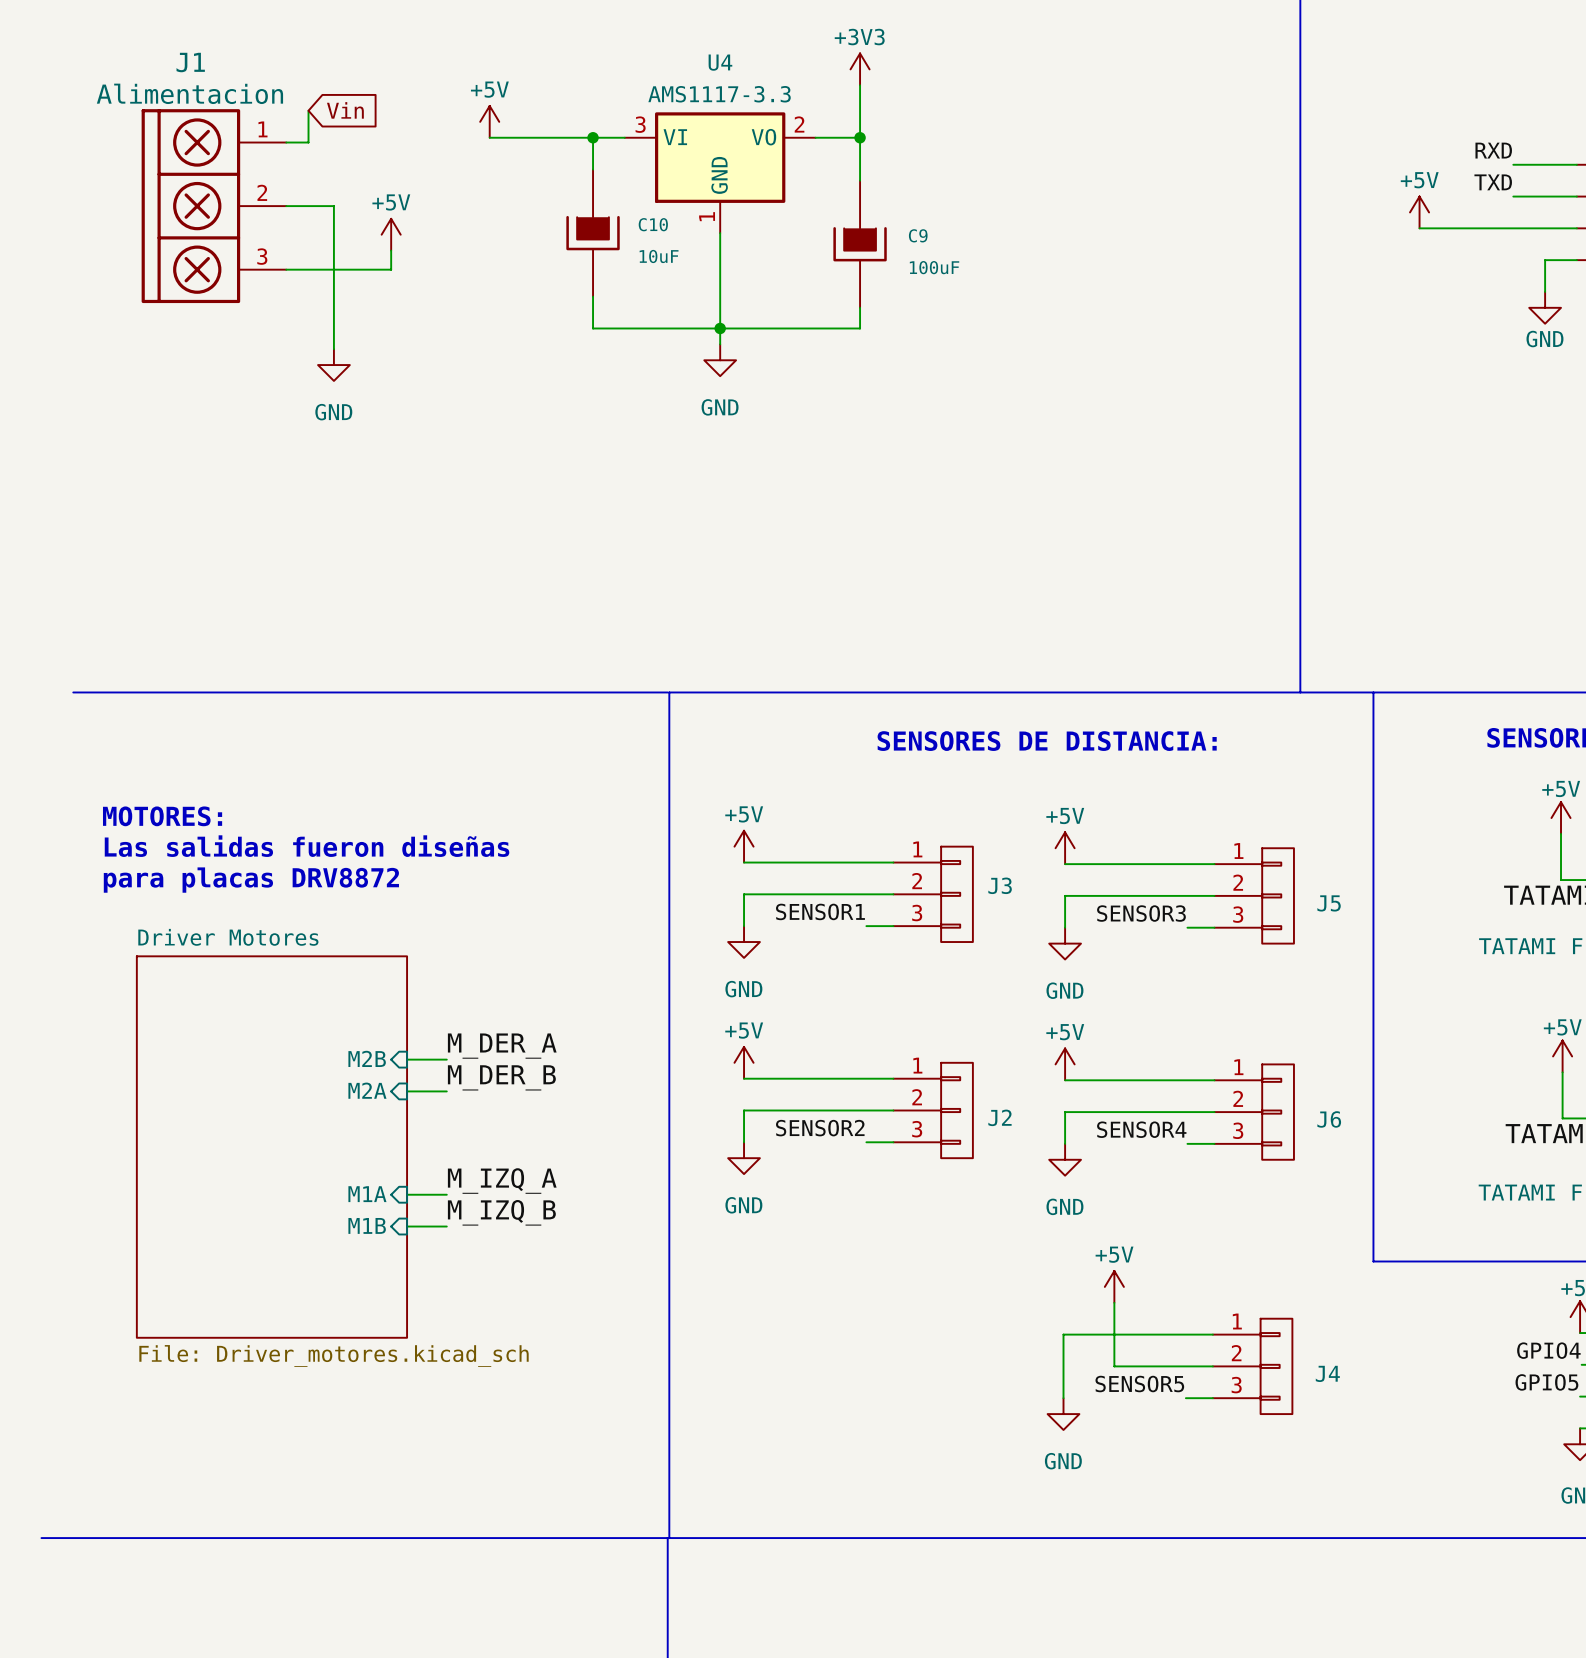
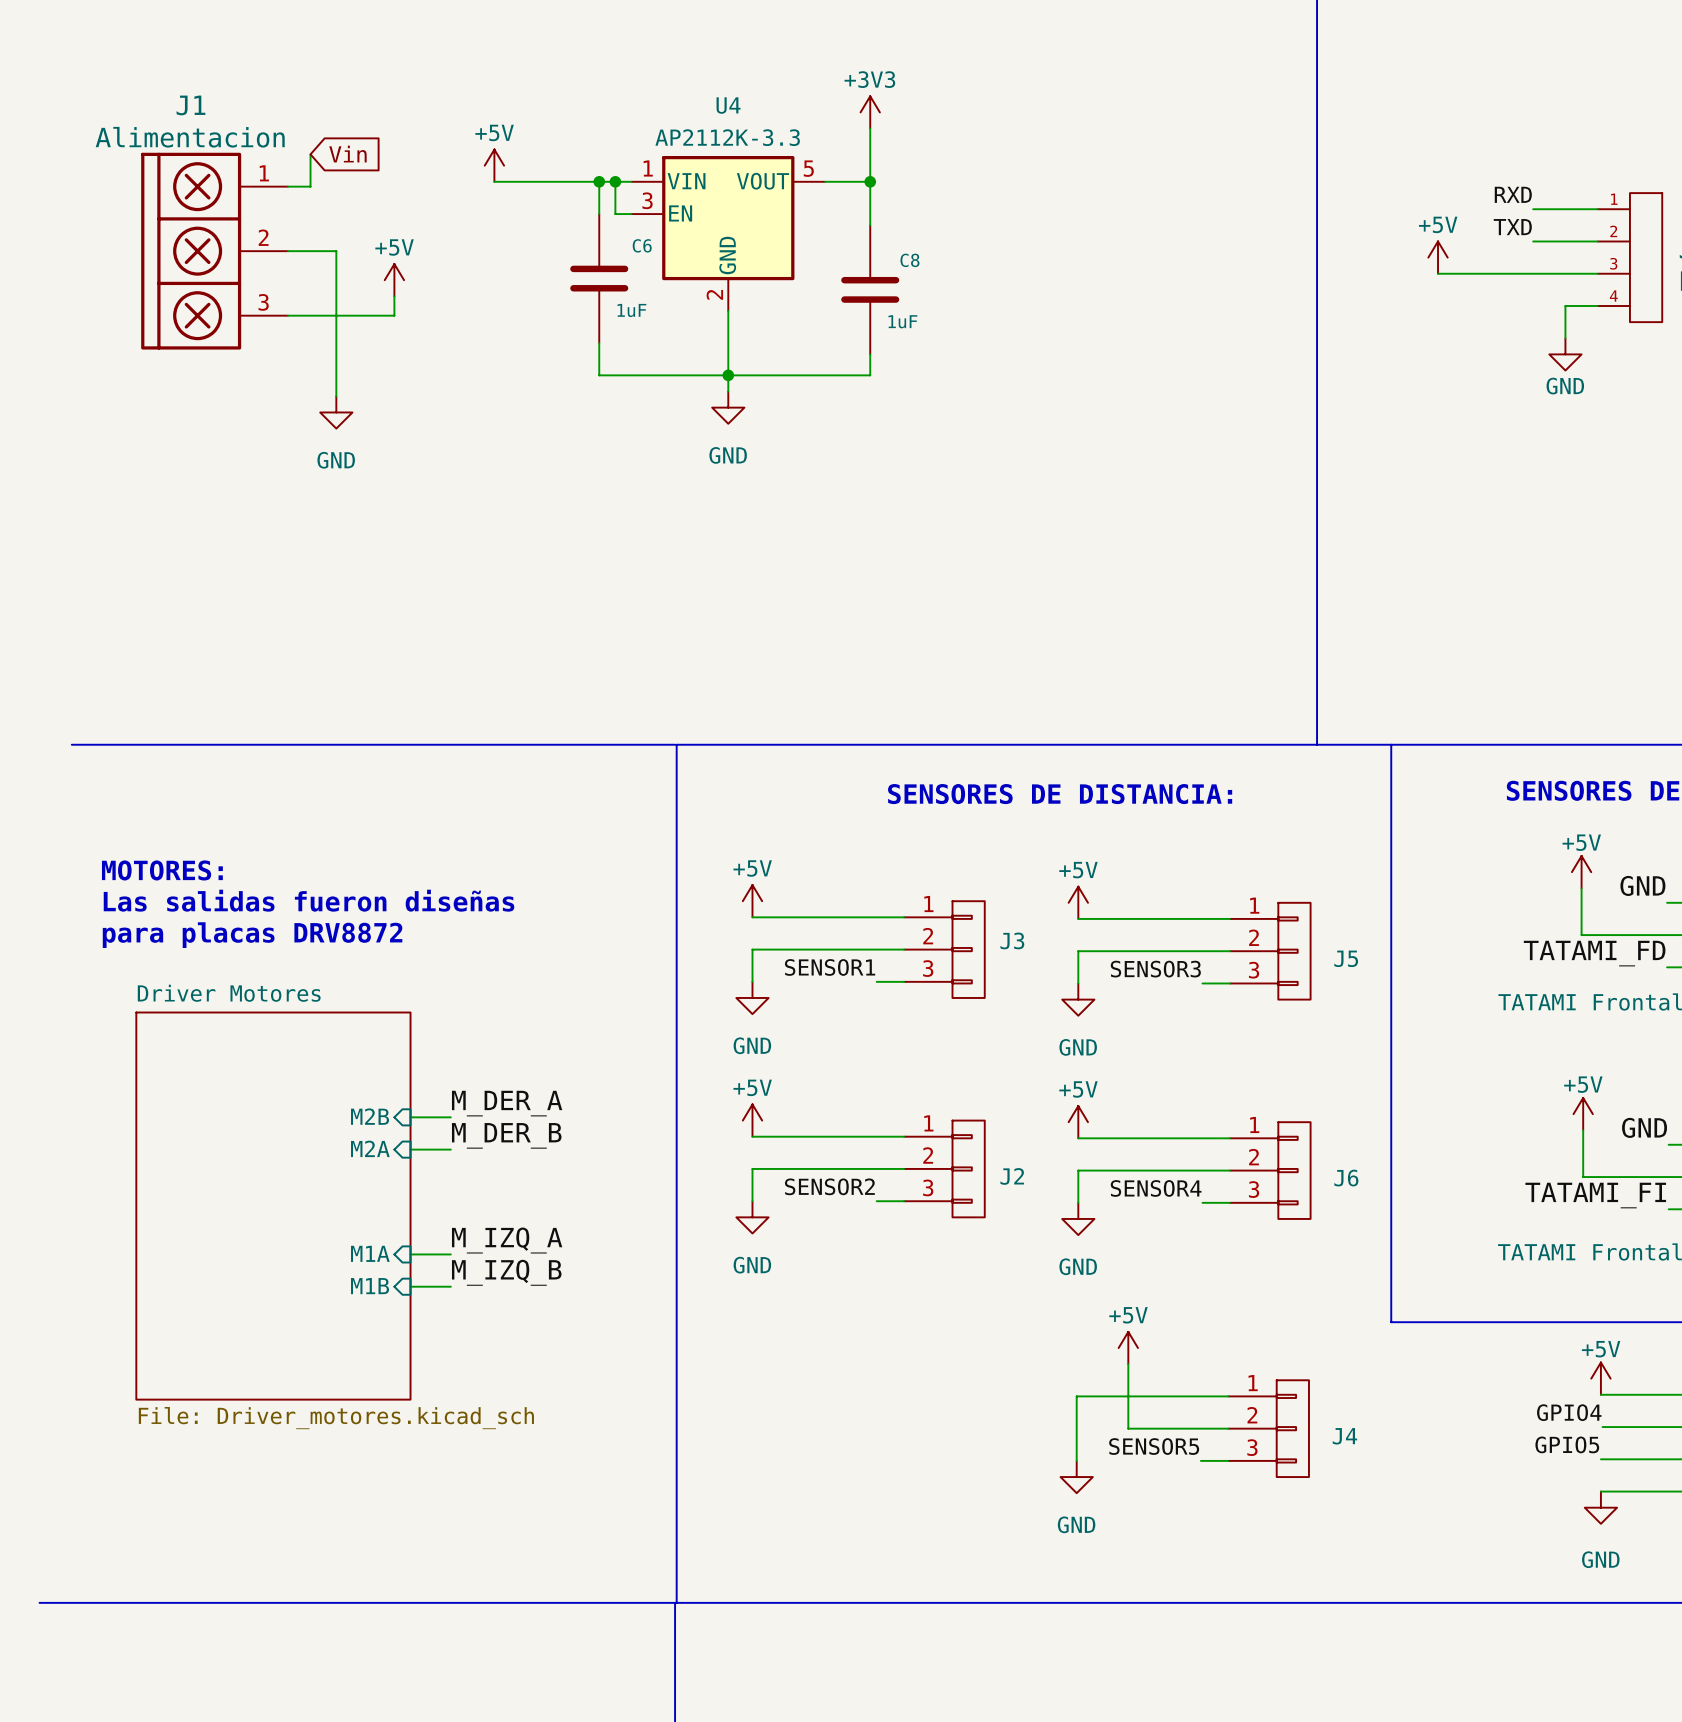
U4 value: AMS1117-3.3 (719, 94) -> AP2112K-3.3 (727, 137)
U4 symbol: [624, 112, 816, 234] -> [631, 155, 826, 311]
wire: none -> (615, 181) (615, 214) (631, 214)
junction: none -> (615, 181)
C10: 10uF (593, 233) -> none
C6: none -> 1uF (599, 278)
C9: 100uF (860, 244) -> none
C8: none -> 1uF (870, 289)

